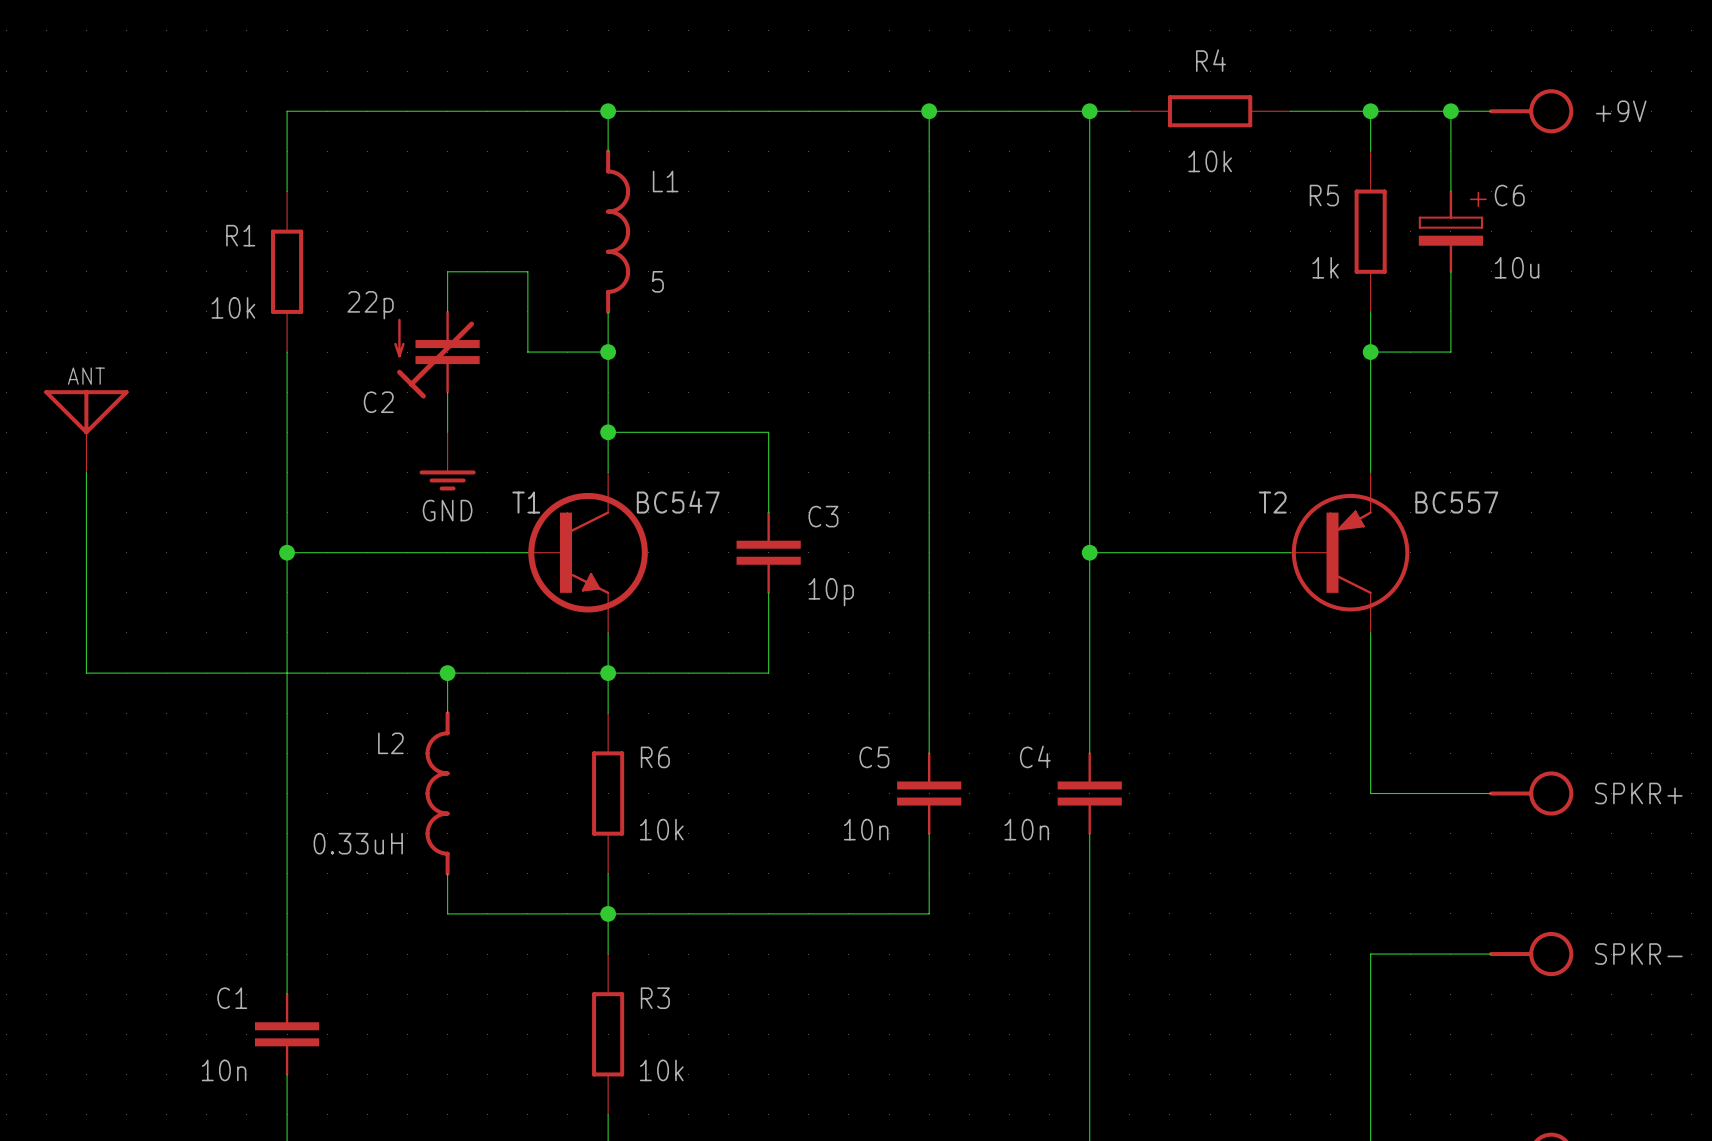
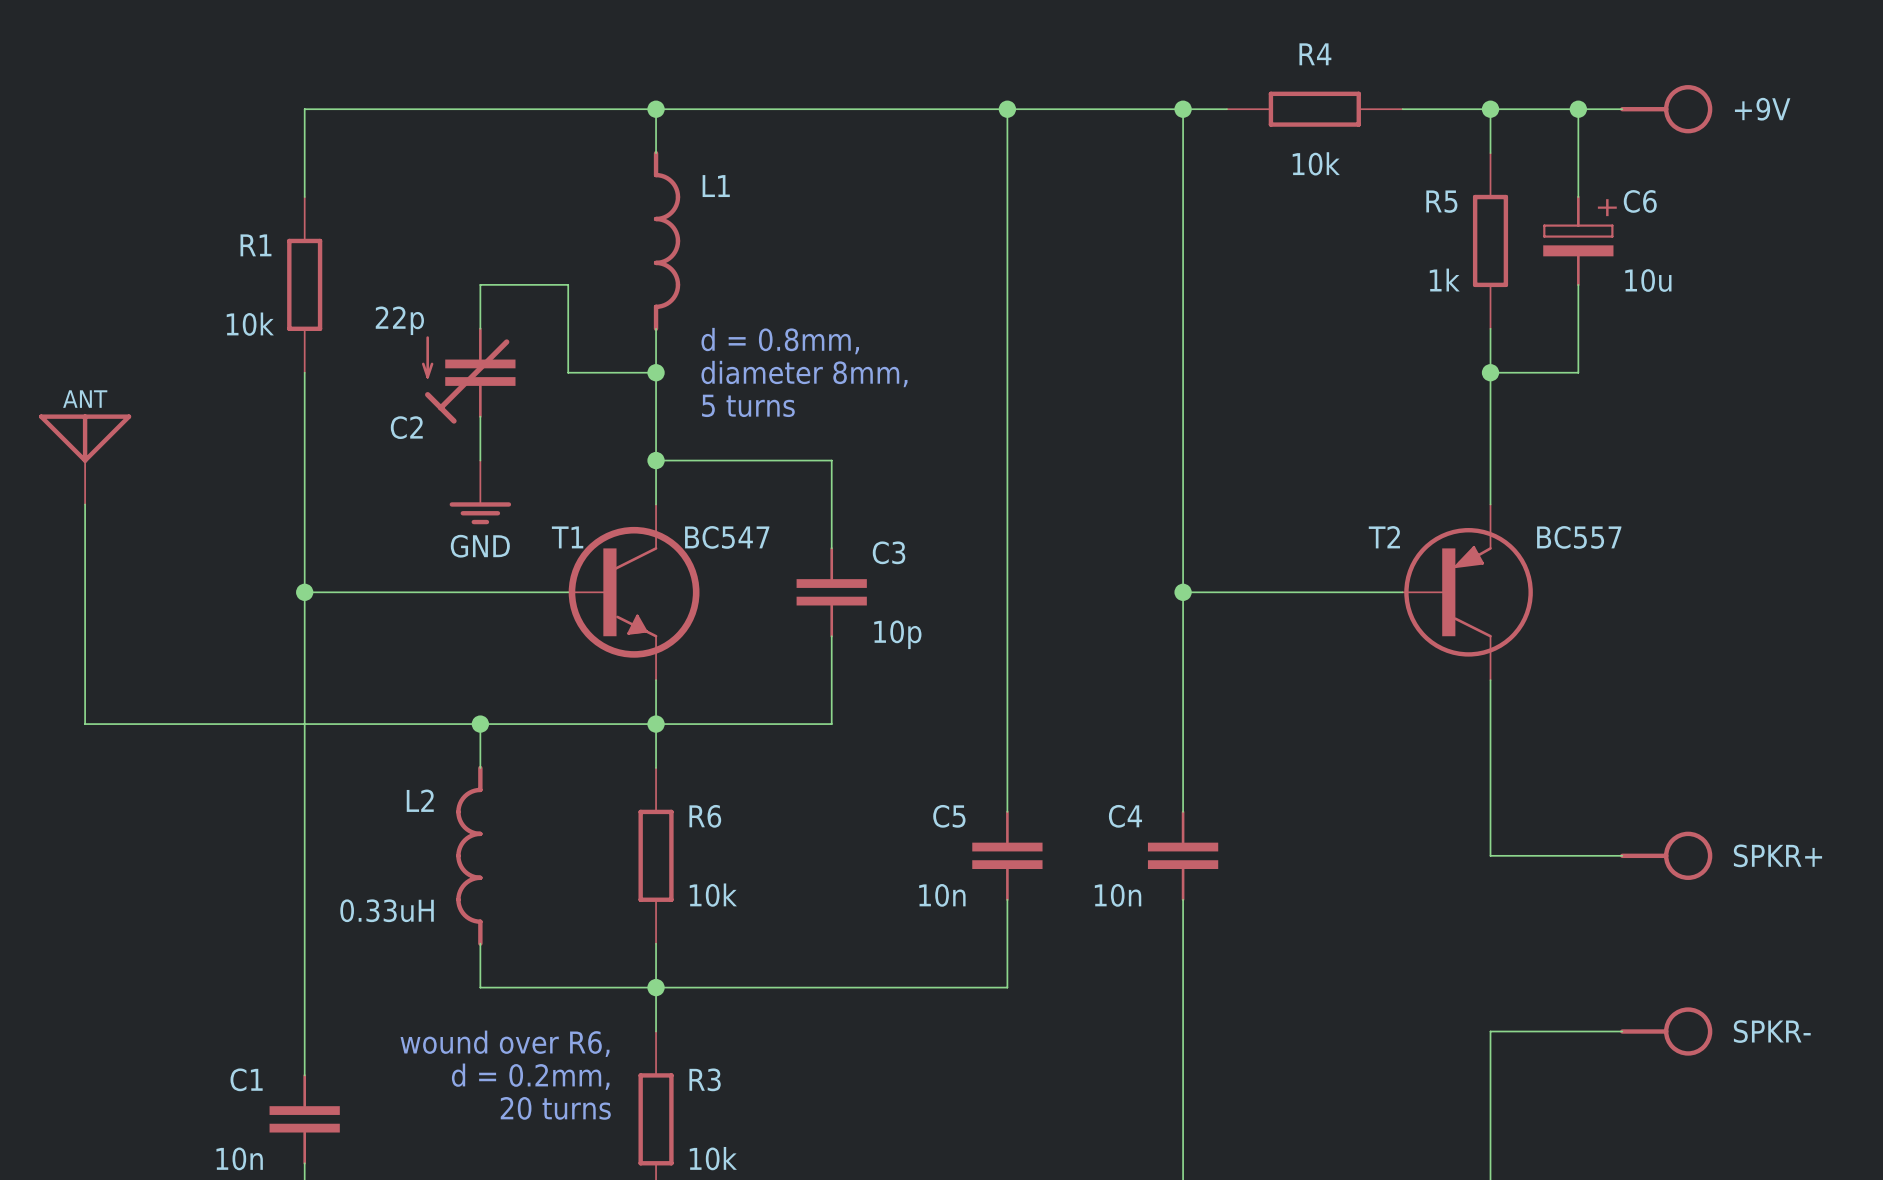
L1 value: 5 (657, 281) -> none
text: none -> d = 0.8mm, (780, 341)
text: none -> diameter 8mm, (804, 374)
text: none -> 5 turns (748, 405)
text: none -> wound over R6, (505, 1043)
text: none -> d = 0.2mm, (530, 1076)
text: none -> 20 turns (555, 1108)

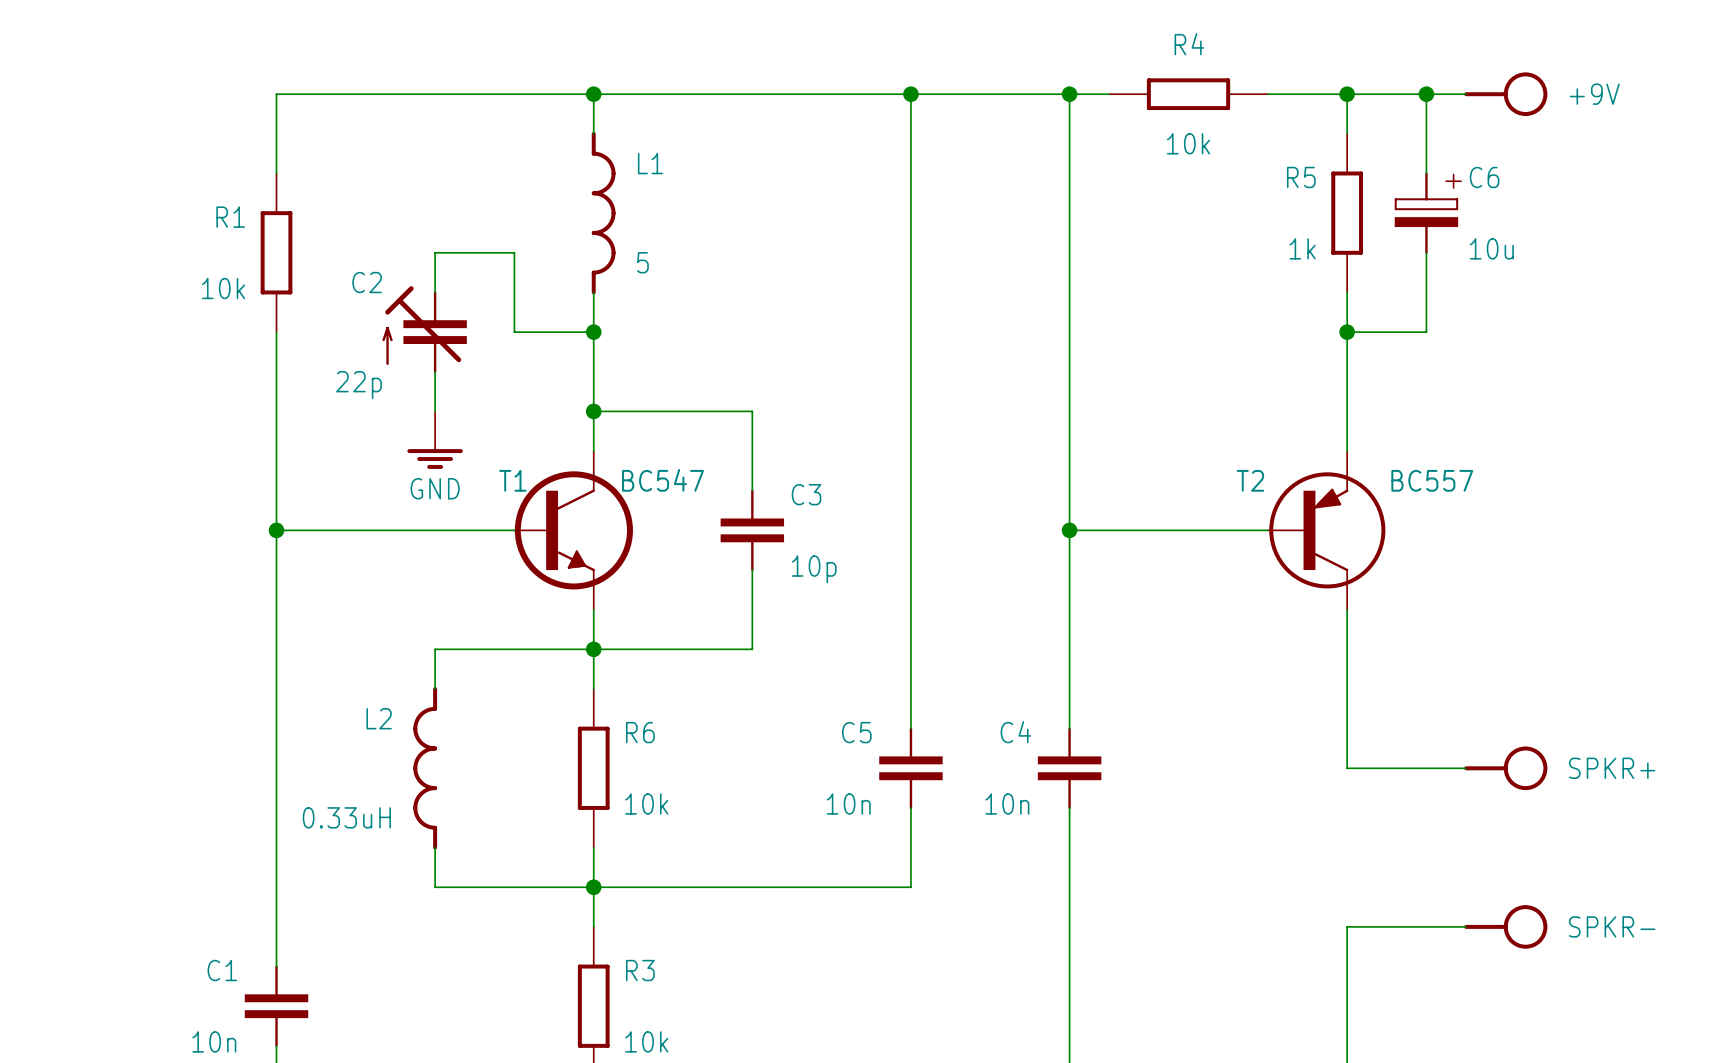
L1 value: none -> 5 (642, 262)
text: d = 0.8mm, (780, 341) -> none
text: diameter 8mm, (804, 374) -> none
C2 flip: as is (468, 375) -> up-down (424, 329)
text: 5 turns (748, 405) -> none
ANT: (85, 459) -> none
wire: (85, 504) (85, 724) (480, 724) -> none
junction: (480, 724) -> none
text: wound over R6, (505, 1043) -> none
text: d = 0.2mm, (530, 1076) -> none
text: 20 turns (555, 1108) -> none

